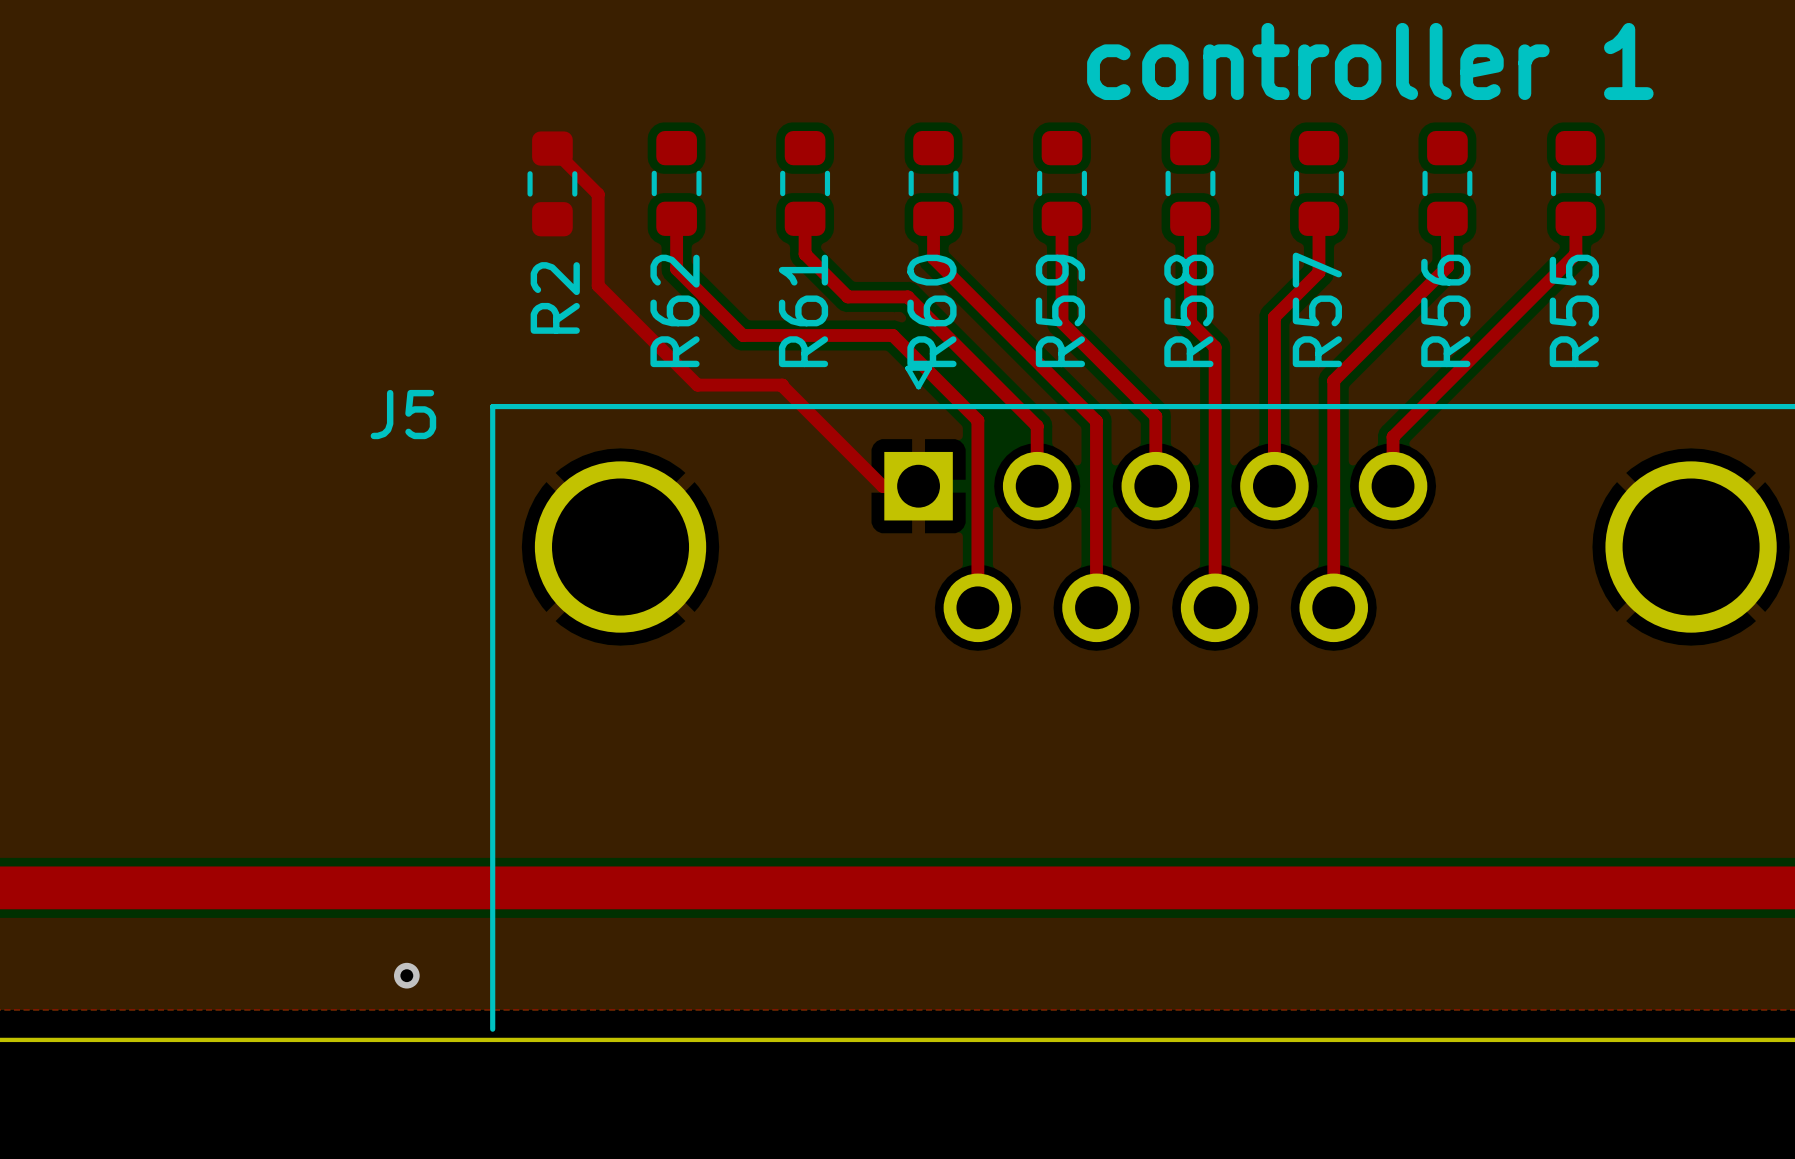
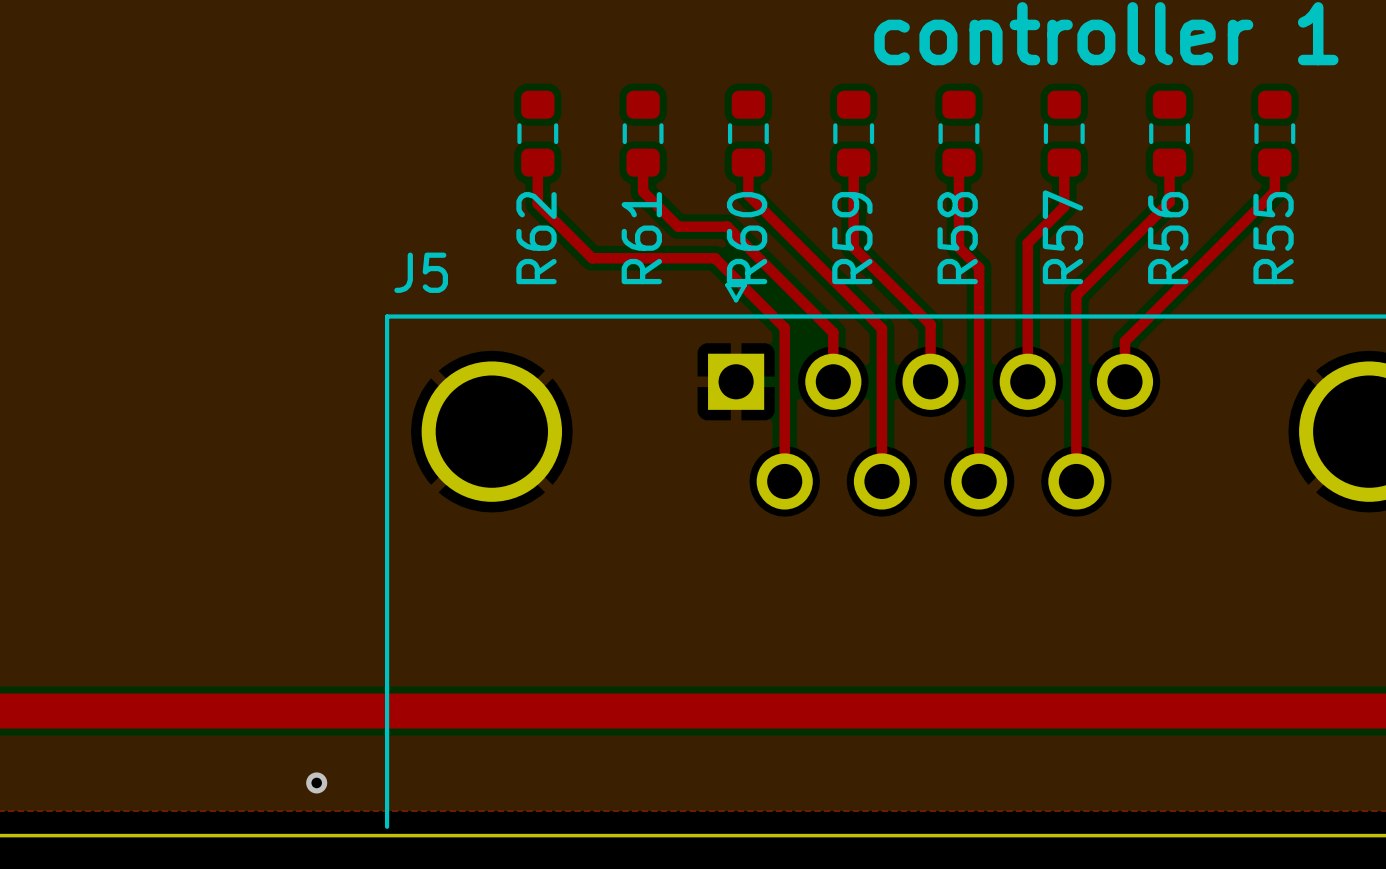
top track: (552, 148) (598, 194) (598, 285) (697, 385) (782, 385) (882, 486) (918, 486) -> none
R2: (552, 183) -> none
J5 name position: J5 (403, 414) -> J5 (421, 272)

